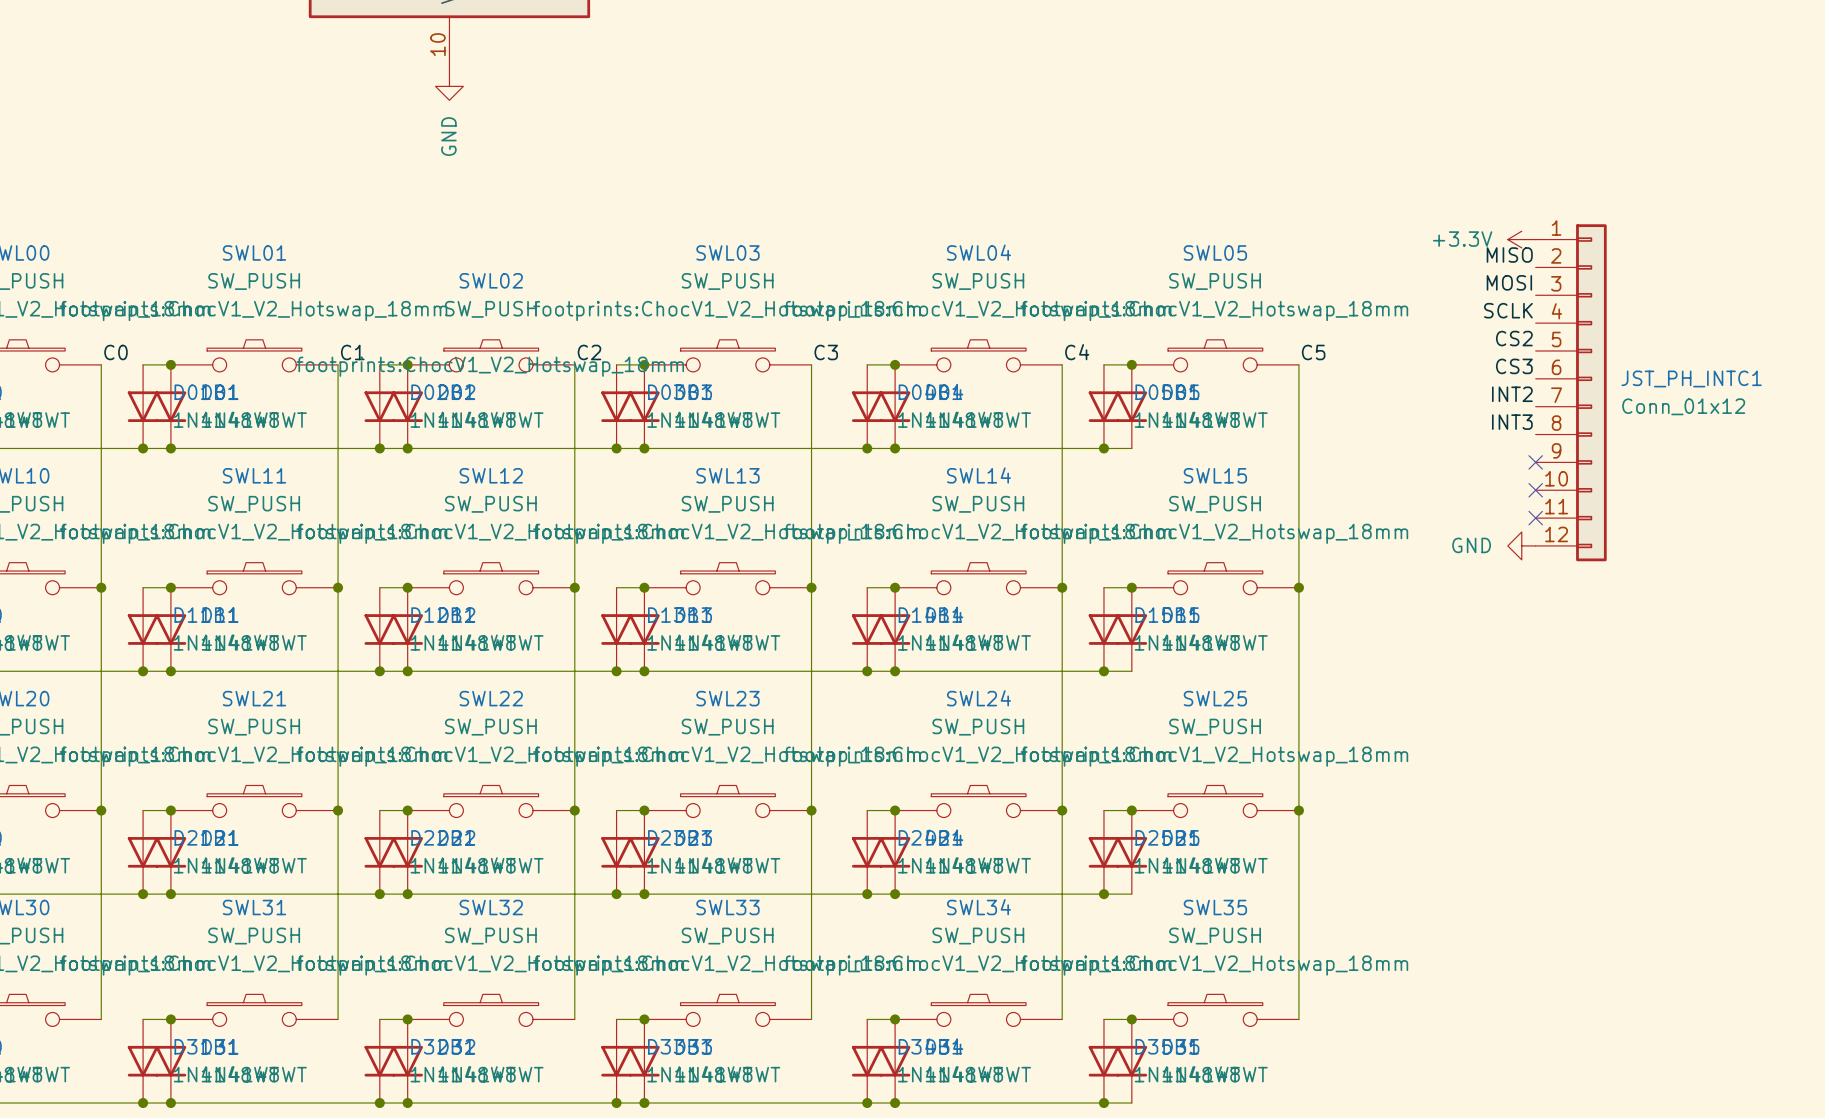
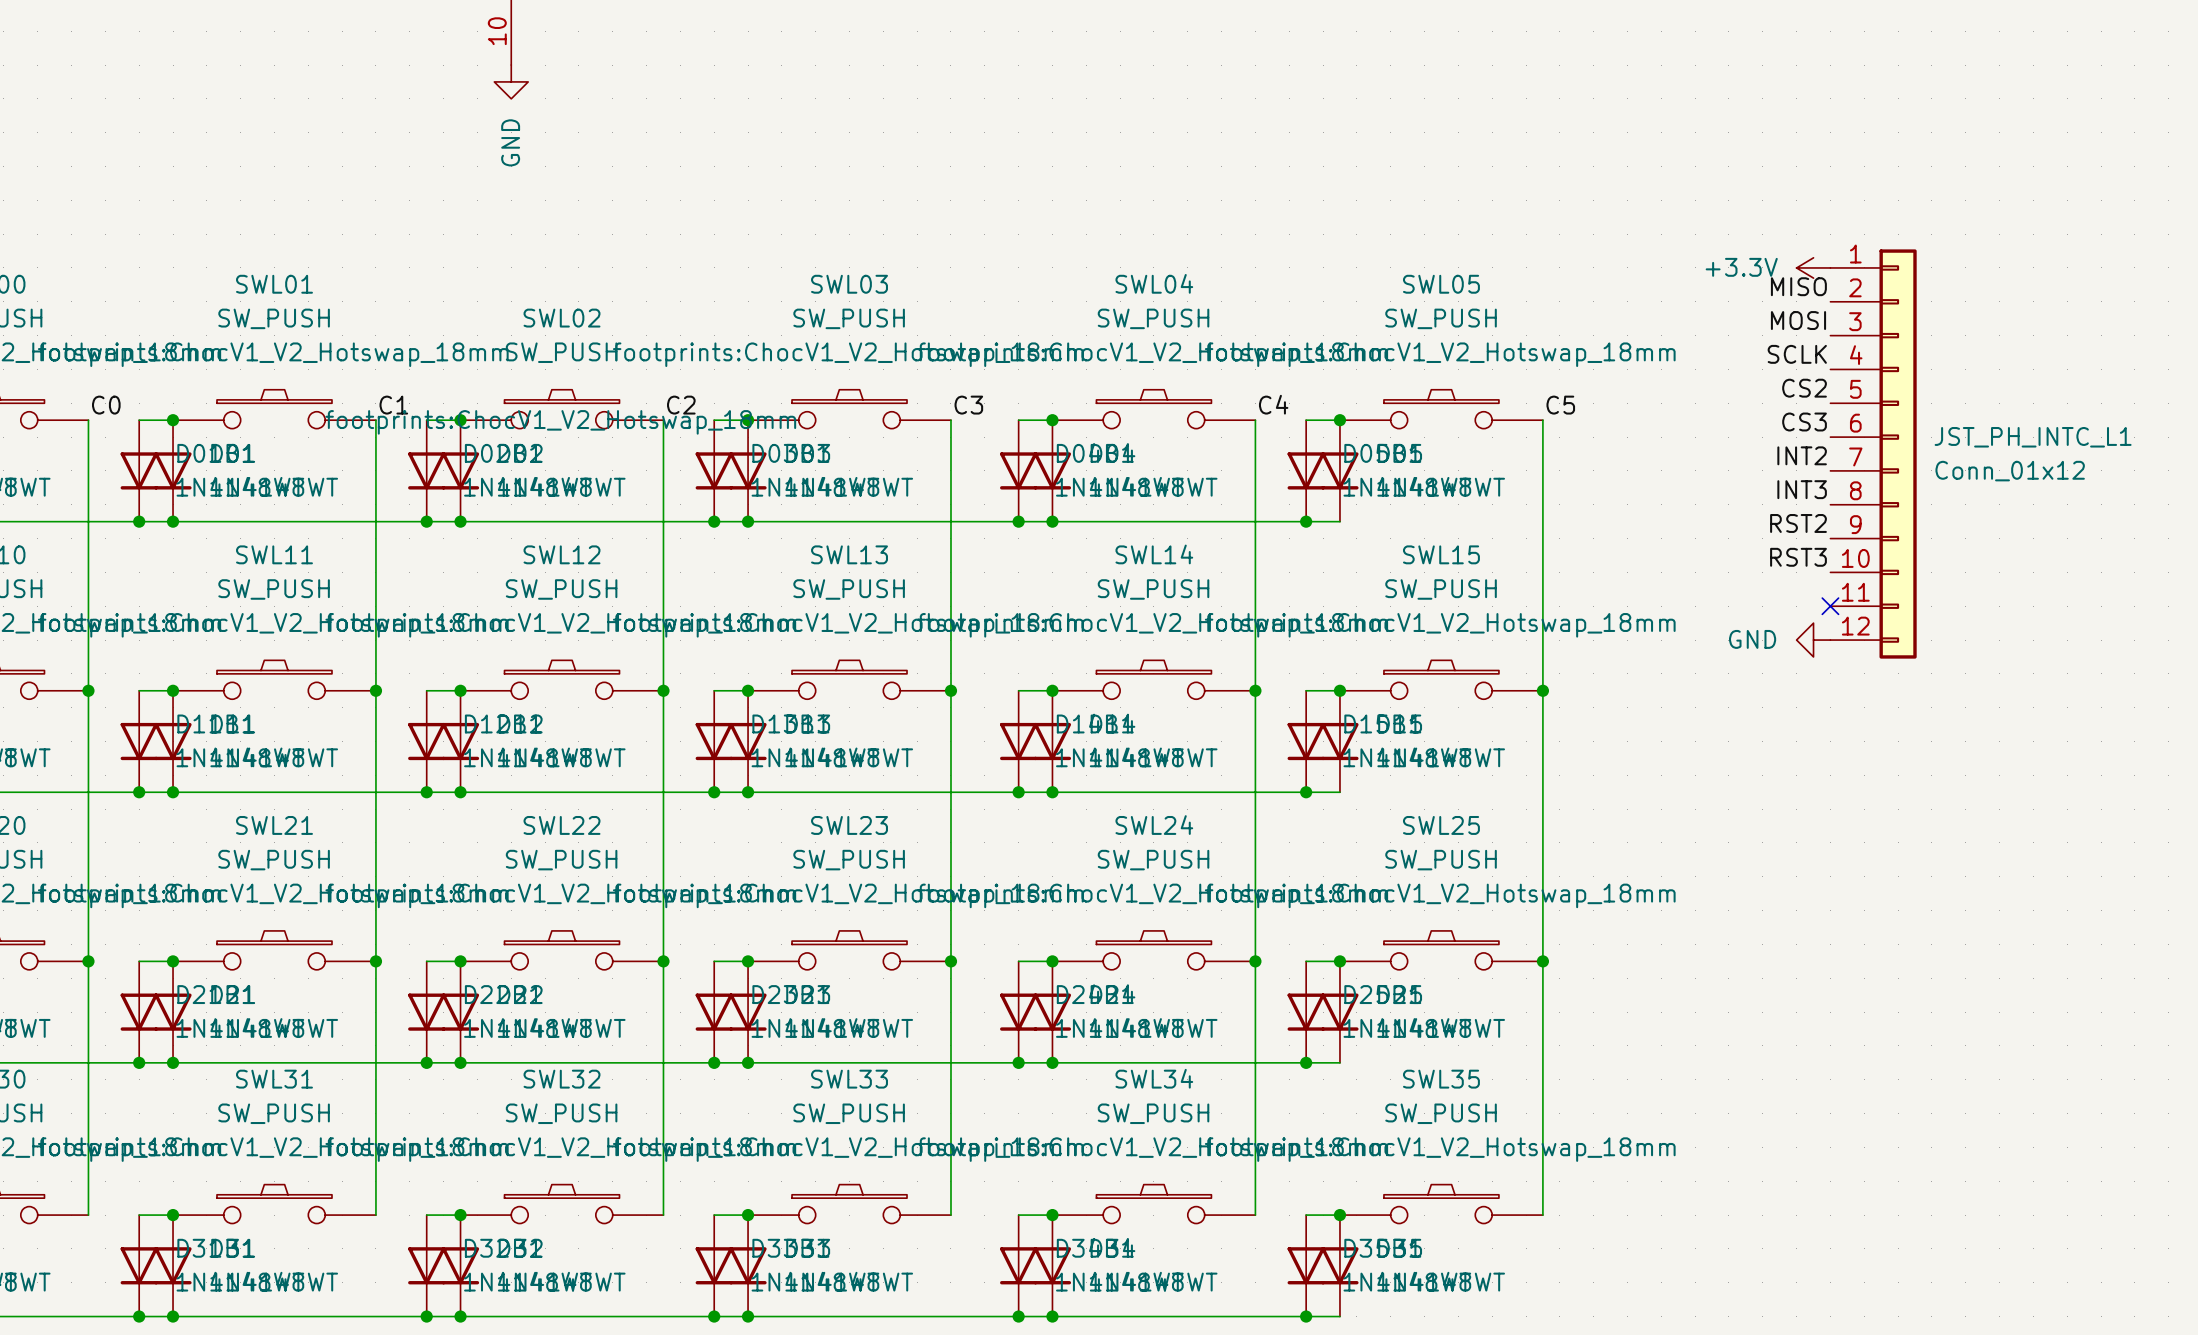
JST_PH_INTC1 name: JST_PH_INTC1 (1691, 378) -> JST_PH_INTC_L1 (2033, 437)
label: none -> RST2 (1798, 523)
no-connect mark: (1535, 462) -> none
label: none -> RST3 (1798, 557)
no-connect mark: (1535, 490) -> none

